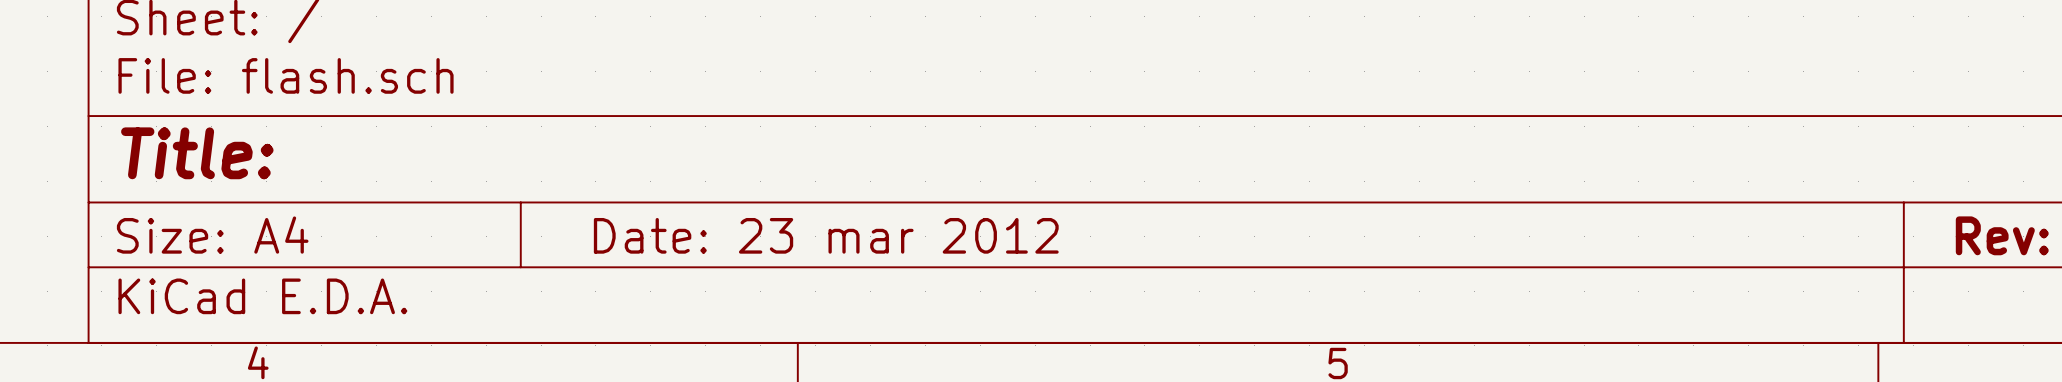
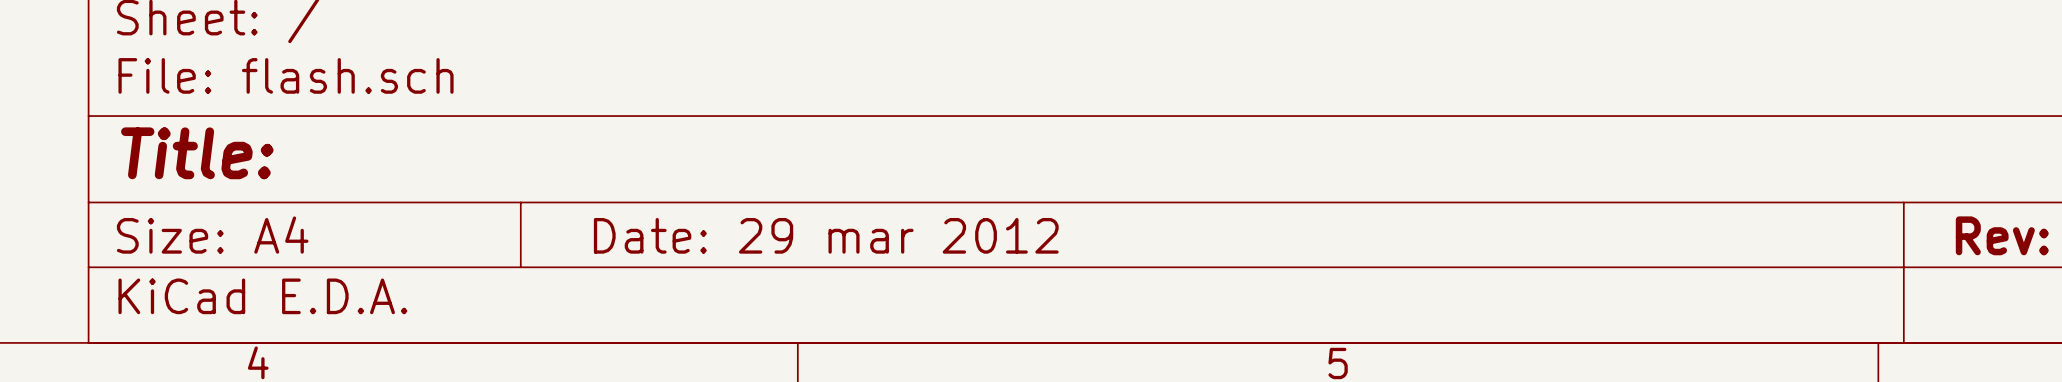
title block: Date: 23 mar 2012 (826, 235) -> Date: 29 mar 2012 (826, 235)

